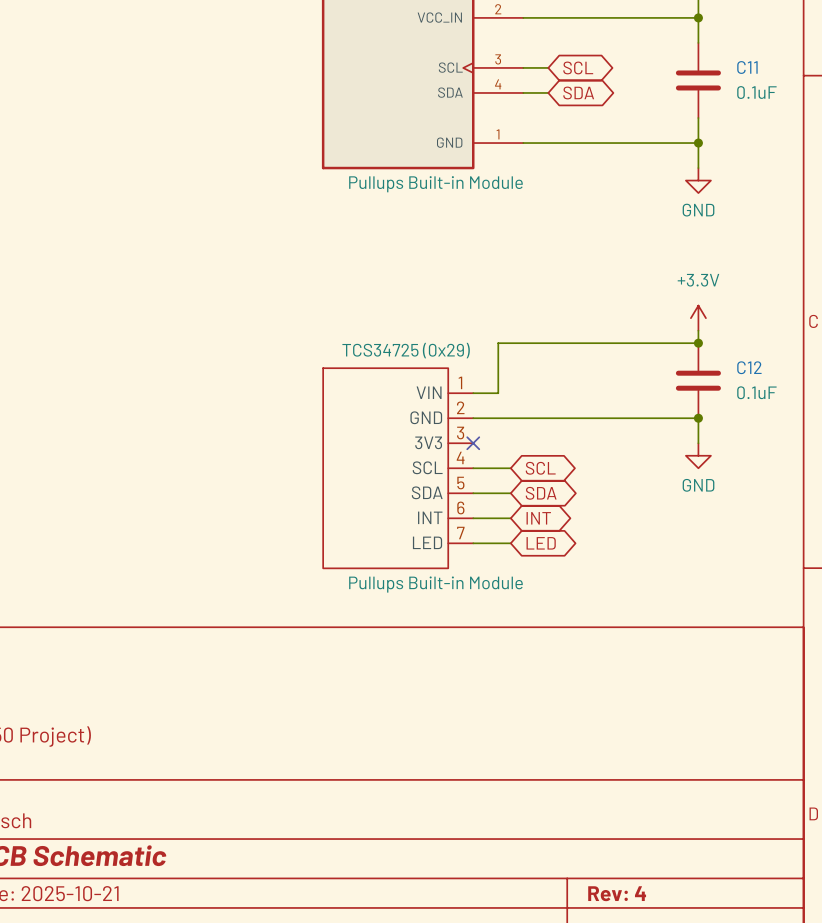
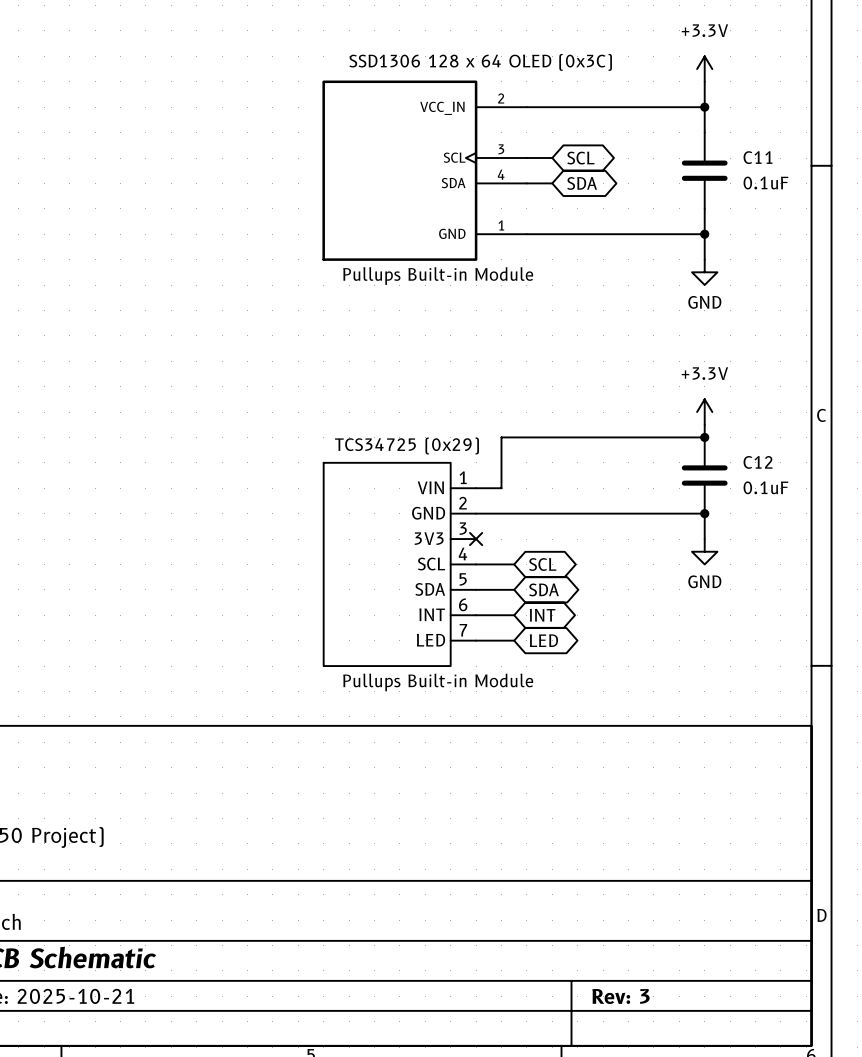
title block: Rev: 4 (617, 893) -> Rev: 3 (620, 996)

